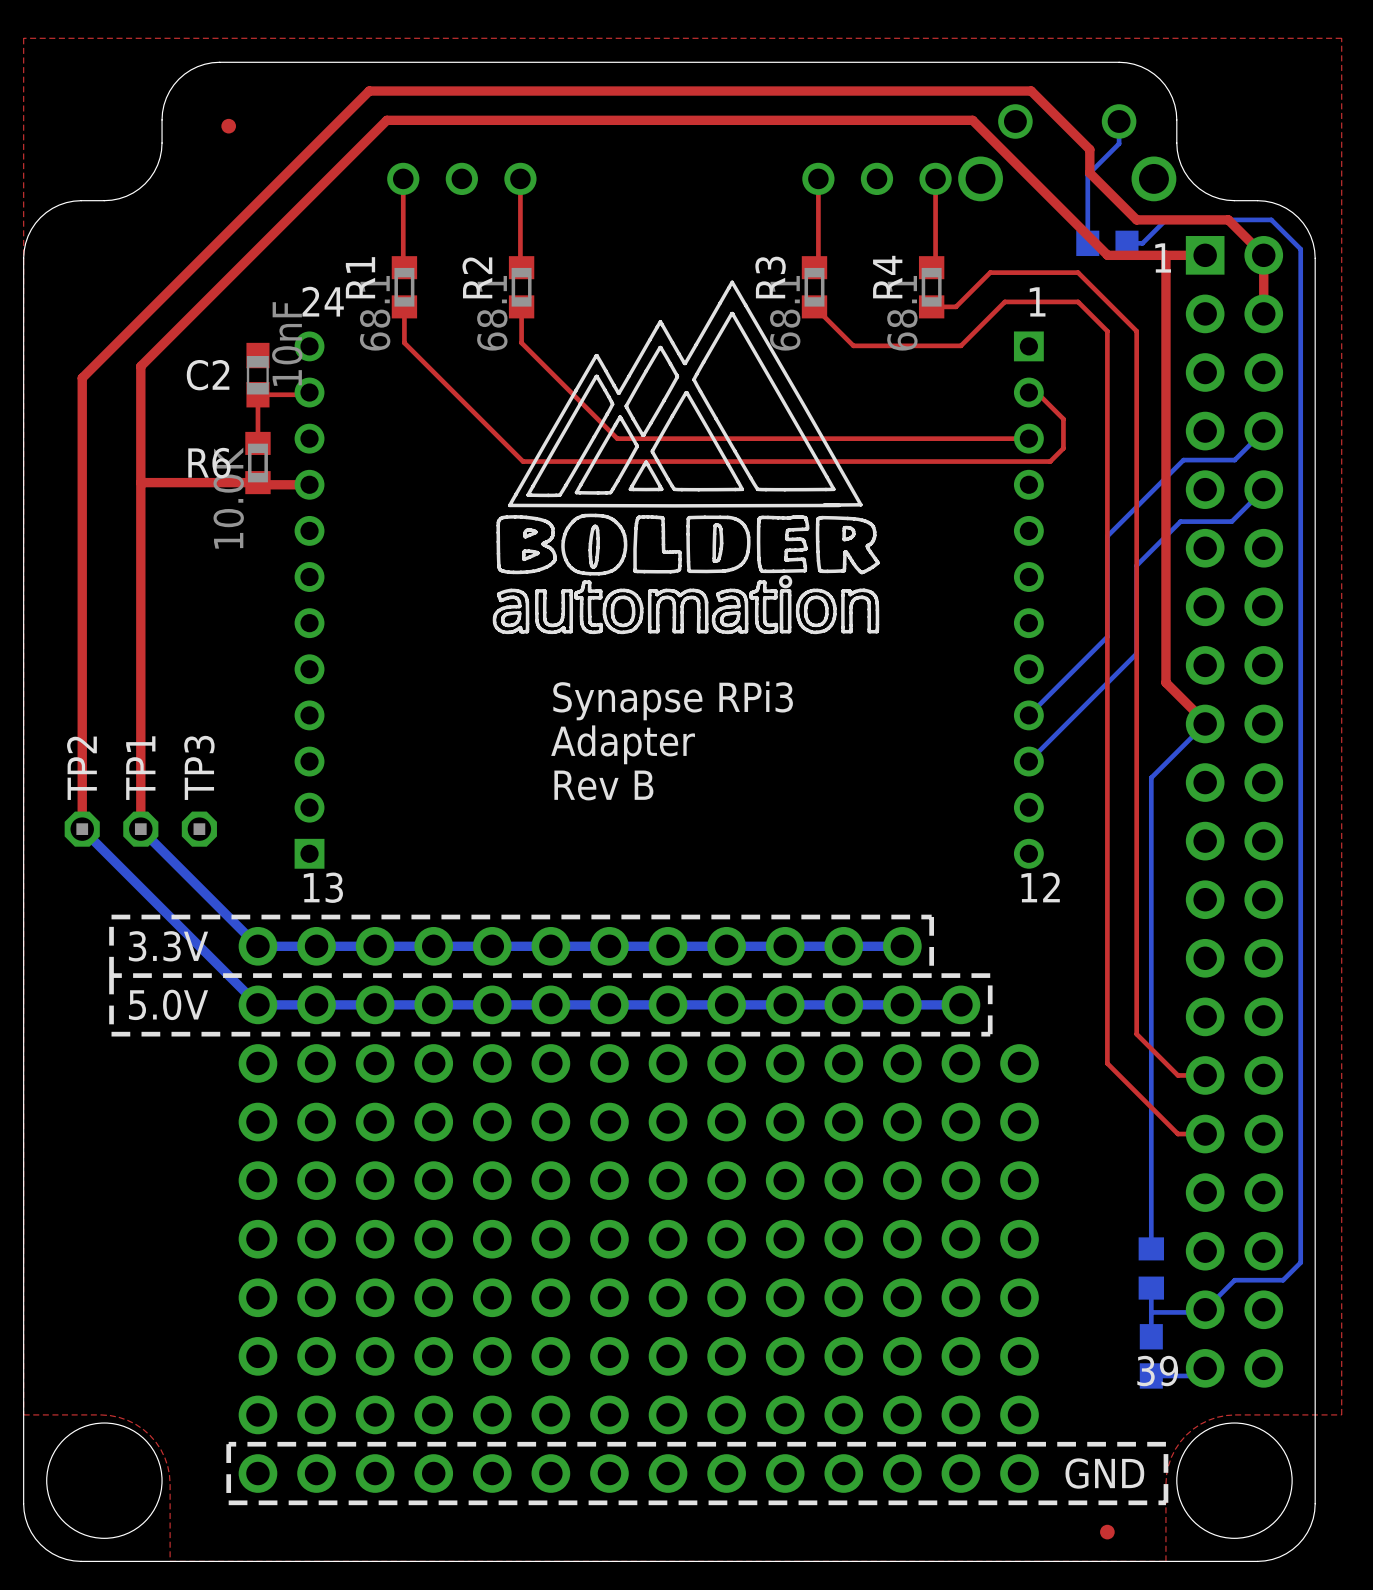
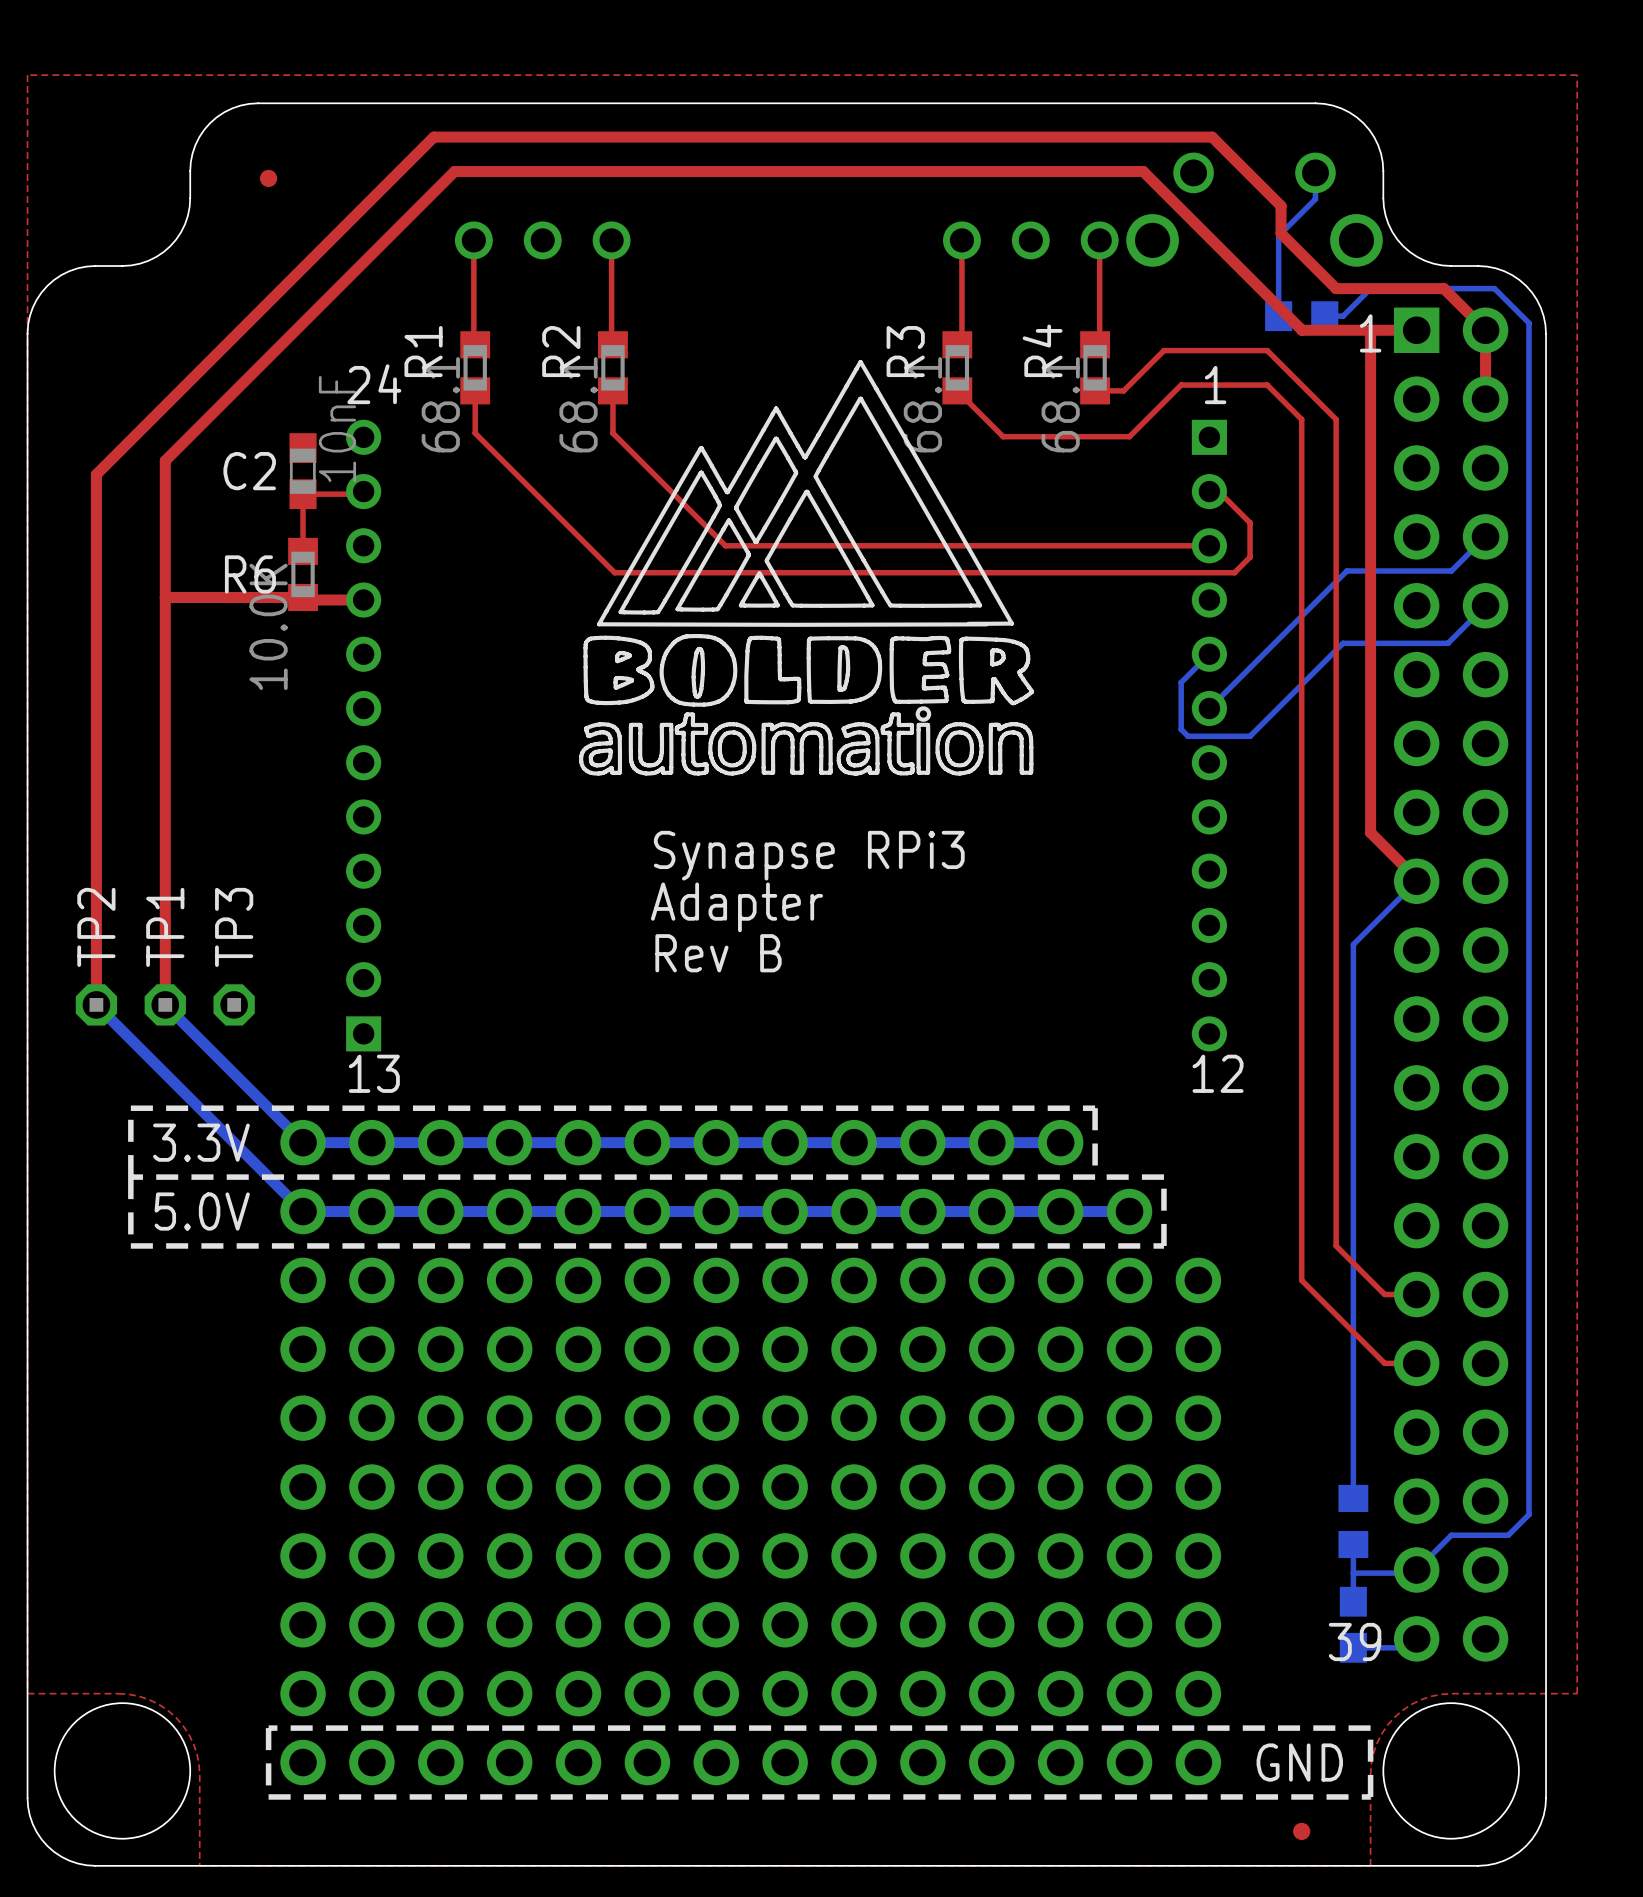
bottom track: (1183, 460) (1107, 536) (1107, 636) (1028, 715) -> (1391, 571) (1346, 571) (1209, 708)
bottom track: (1180, 521) (1136, 565) (1136, 653) (1028, 761) -> (1387, 643) (1343, 643) (1250, 736) (1188, 736) (1181, 729) (1181, 682) (1209, 654)

